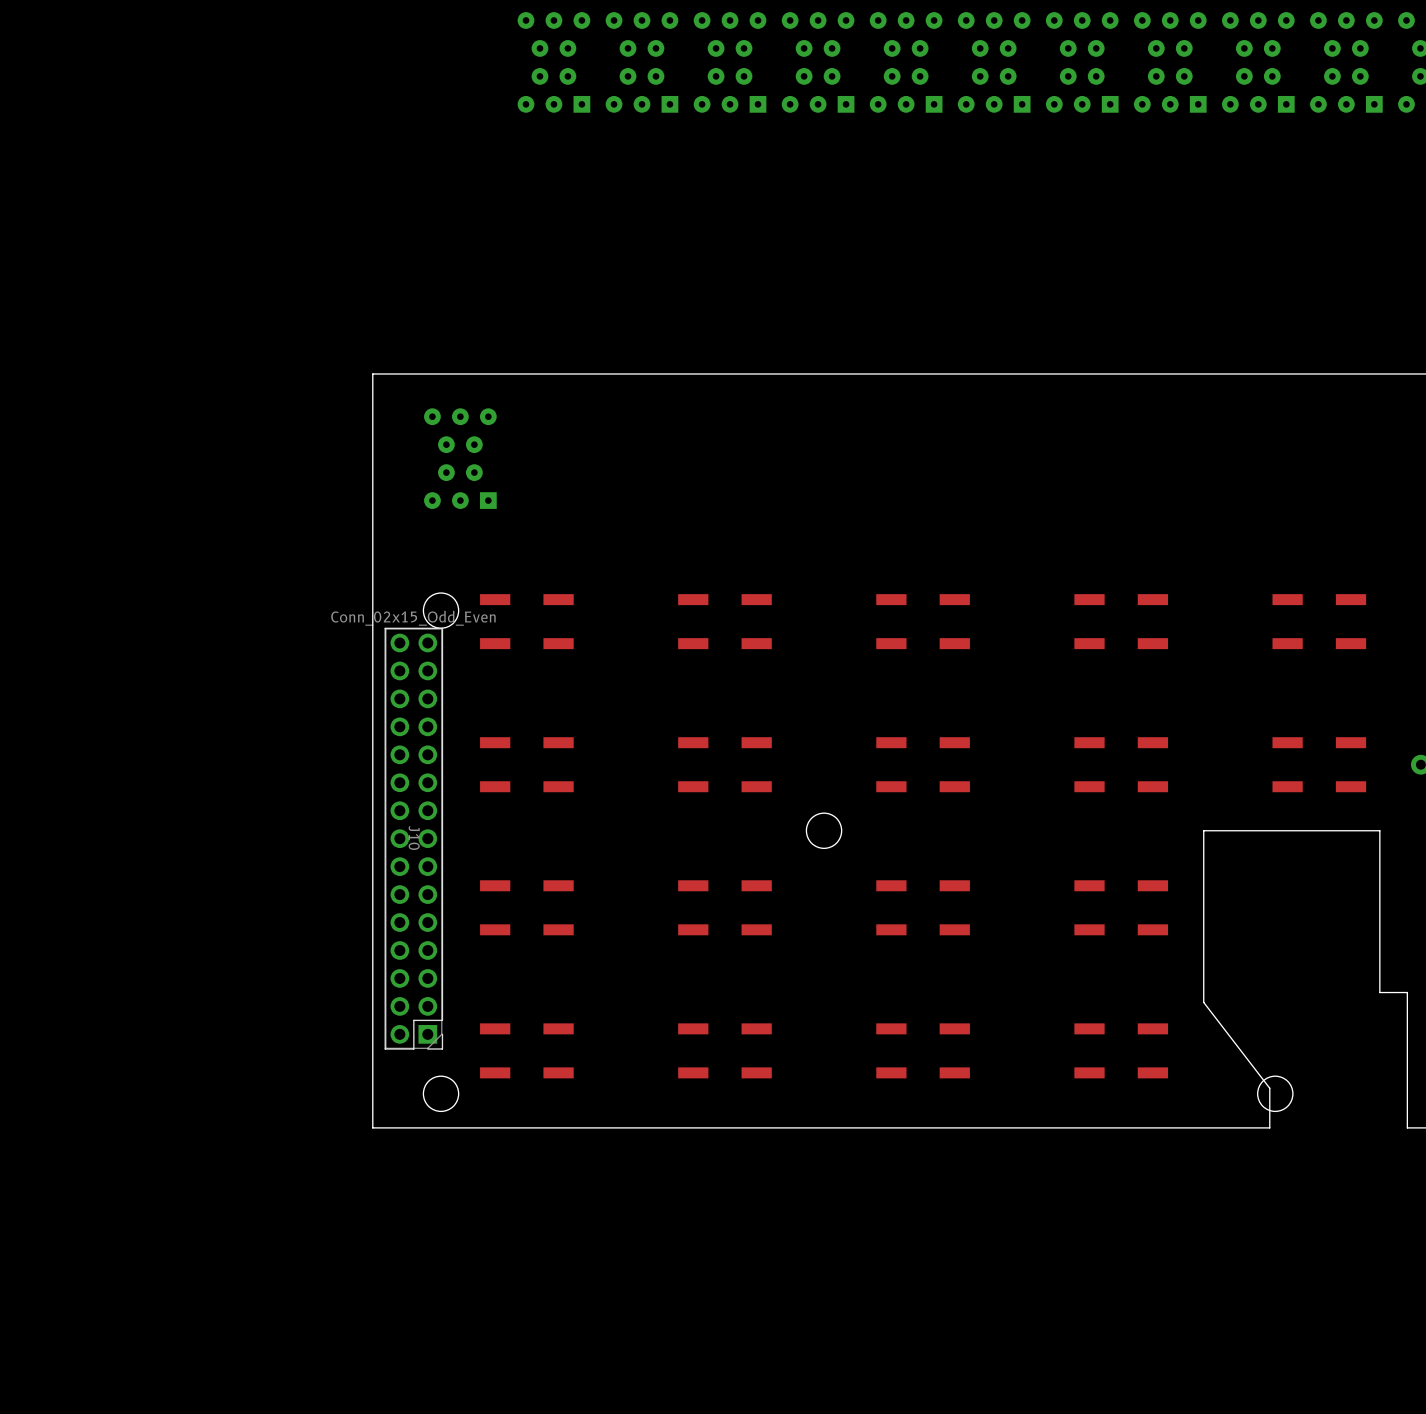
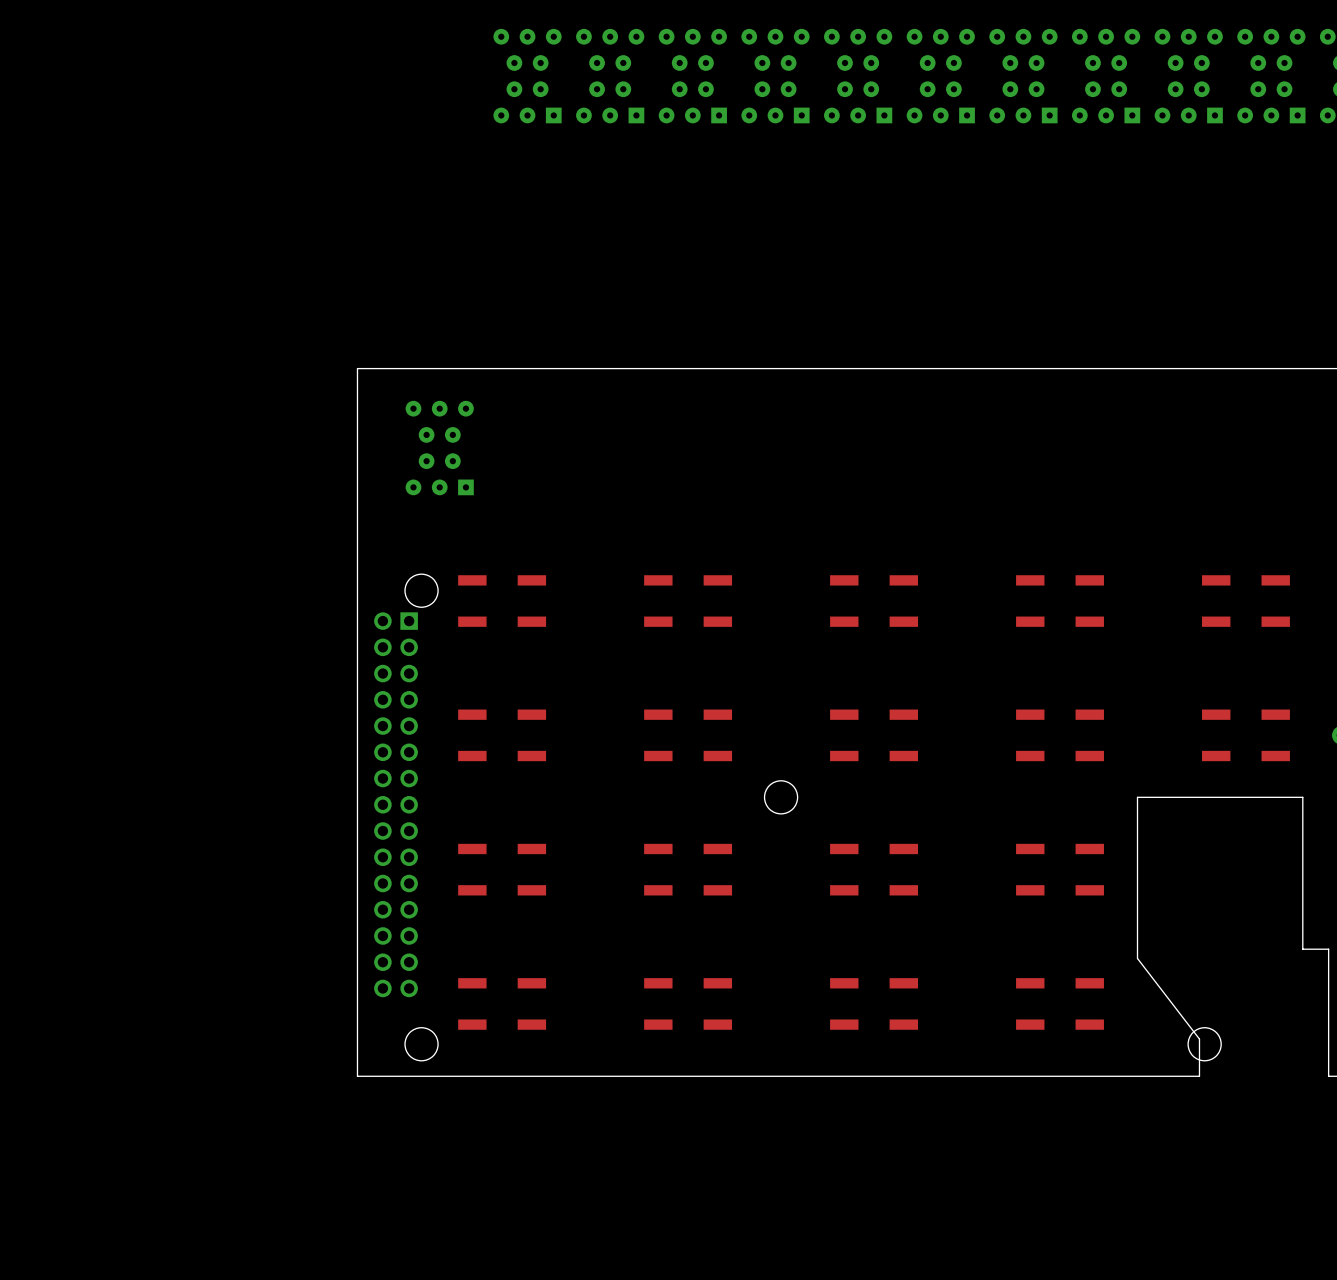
J10 side: bottom (413, 838) -> top (396, 804)

